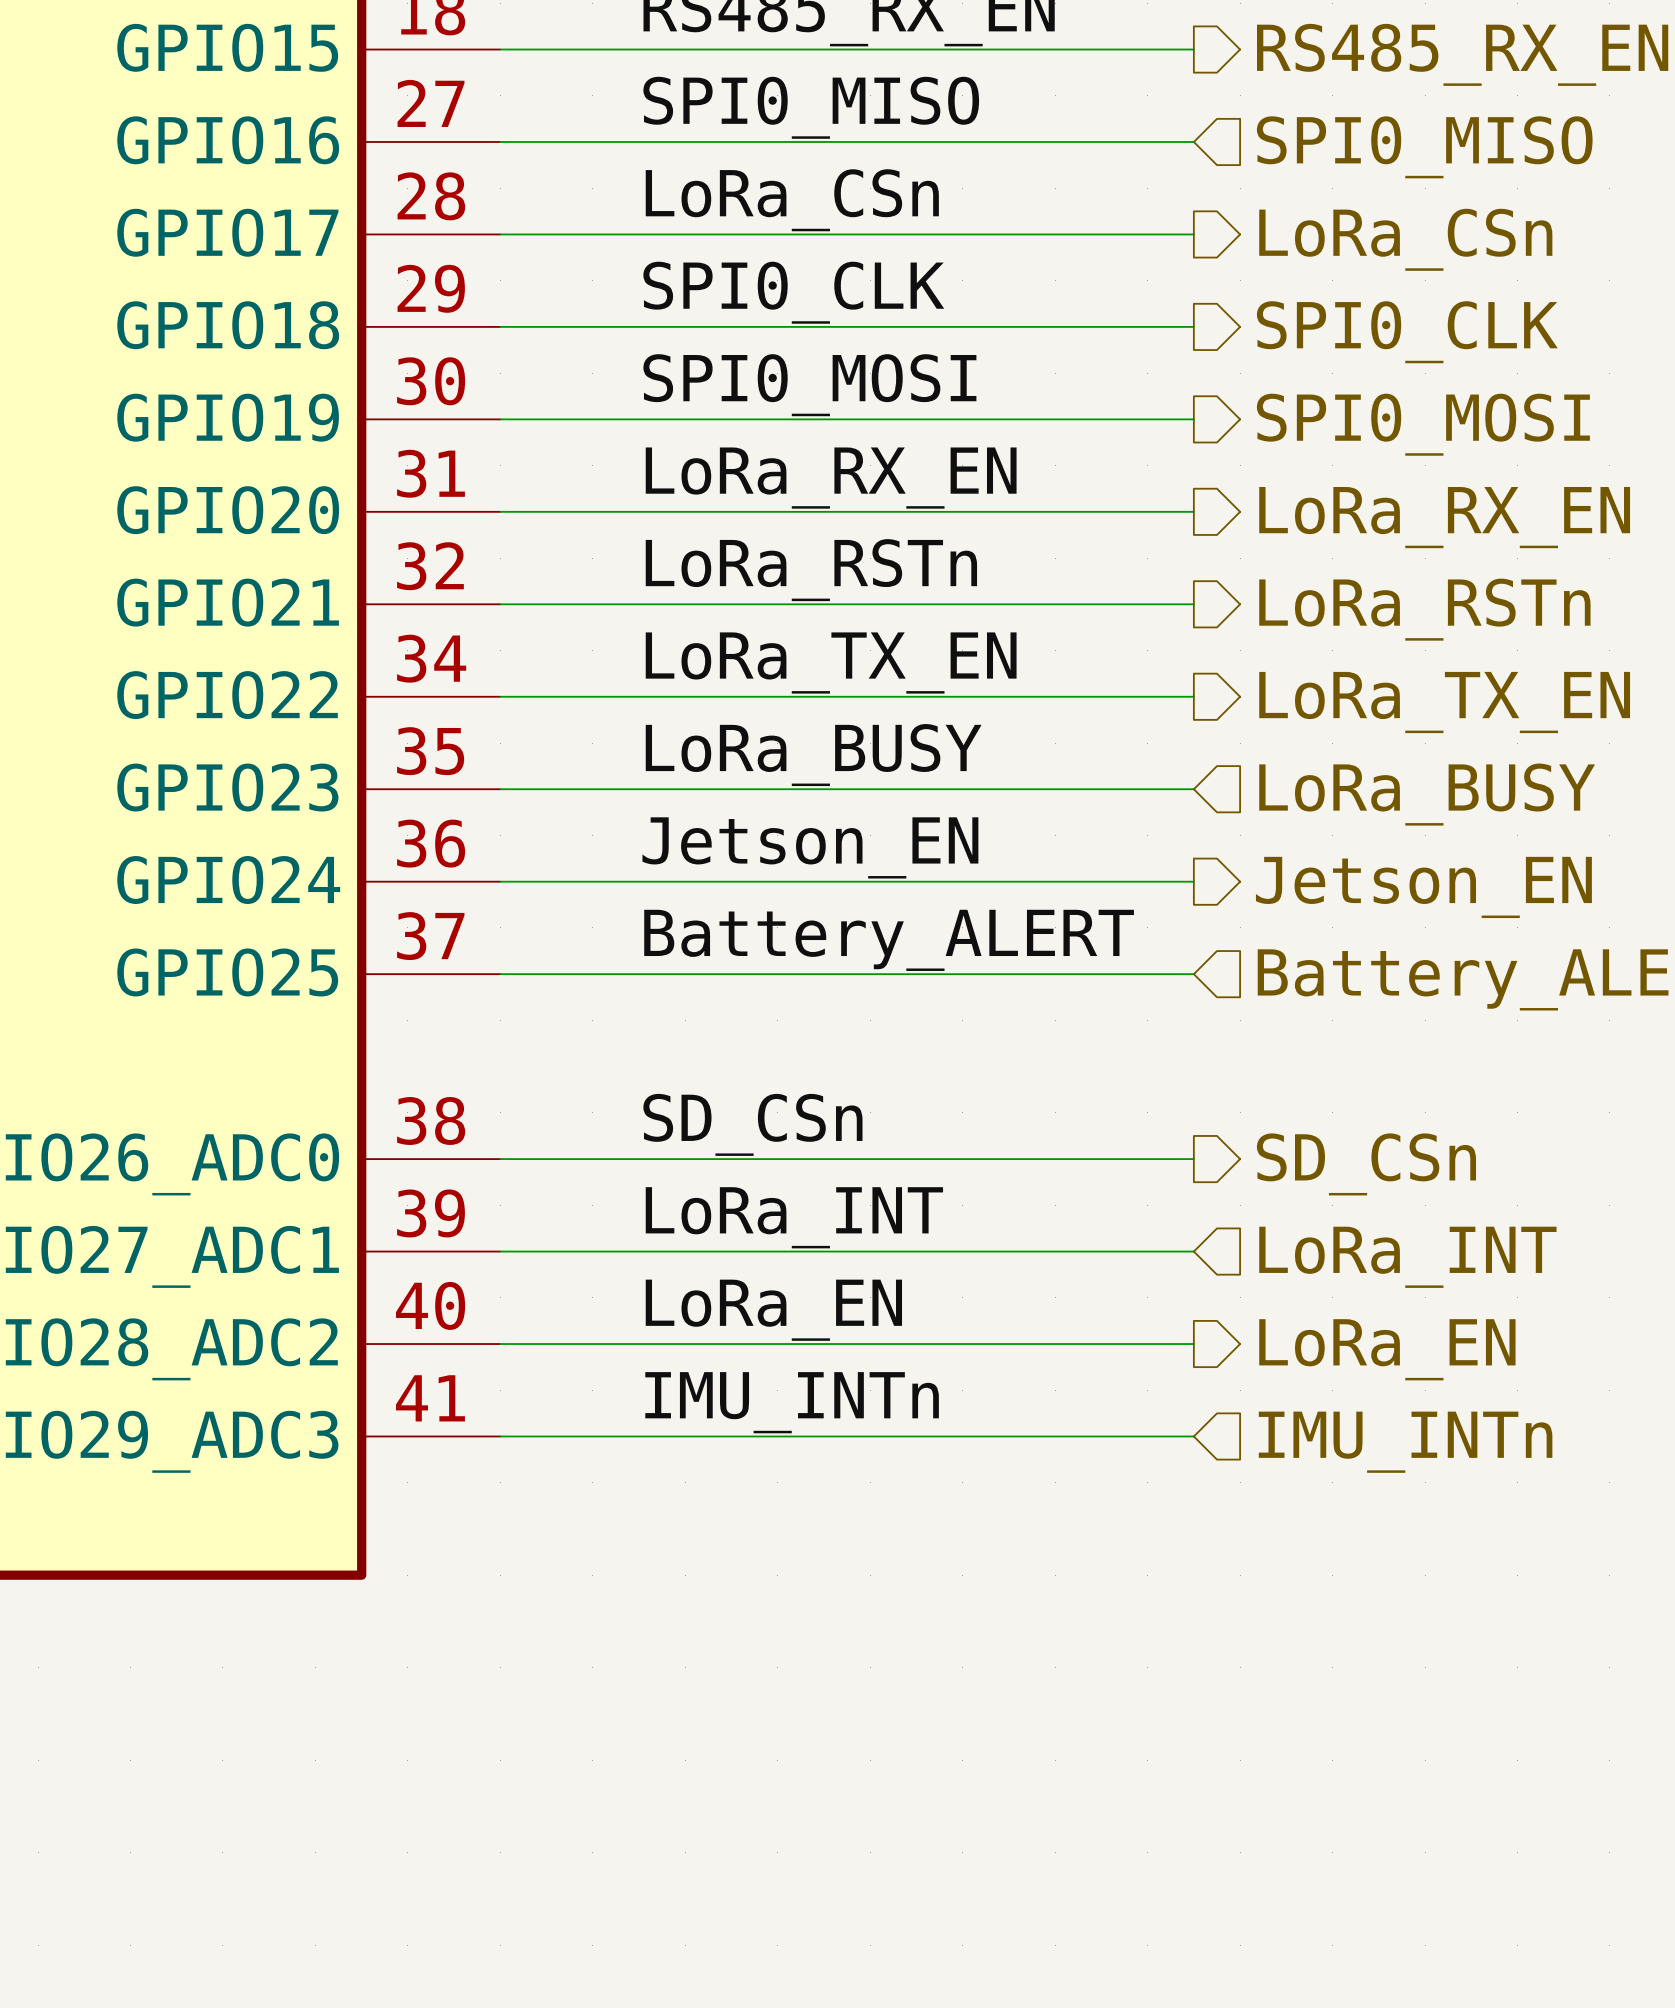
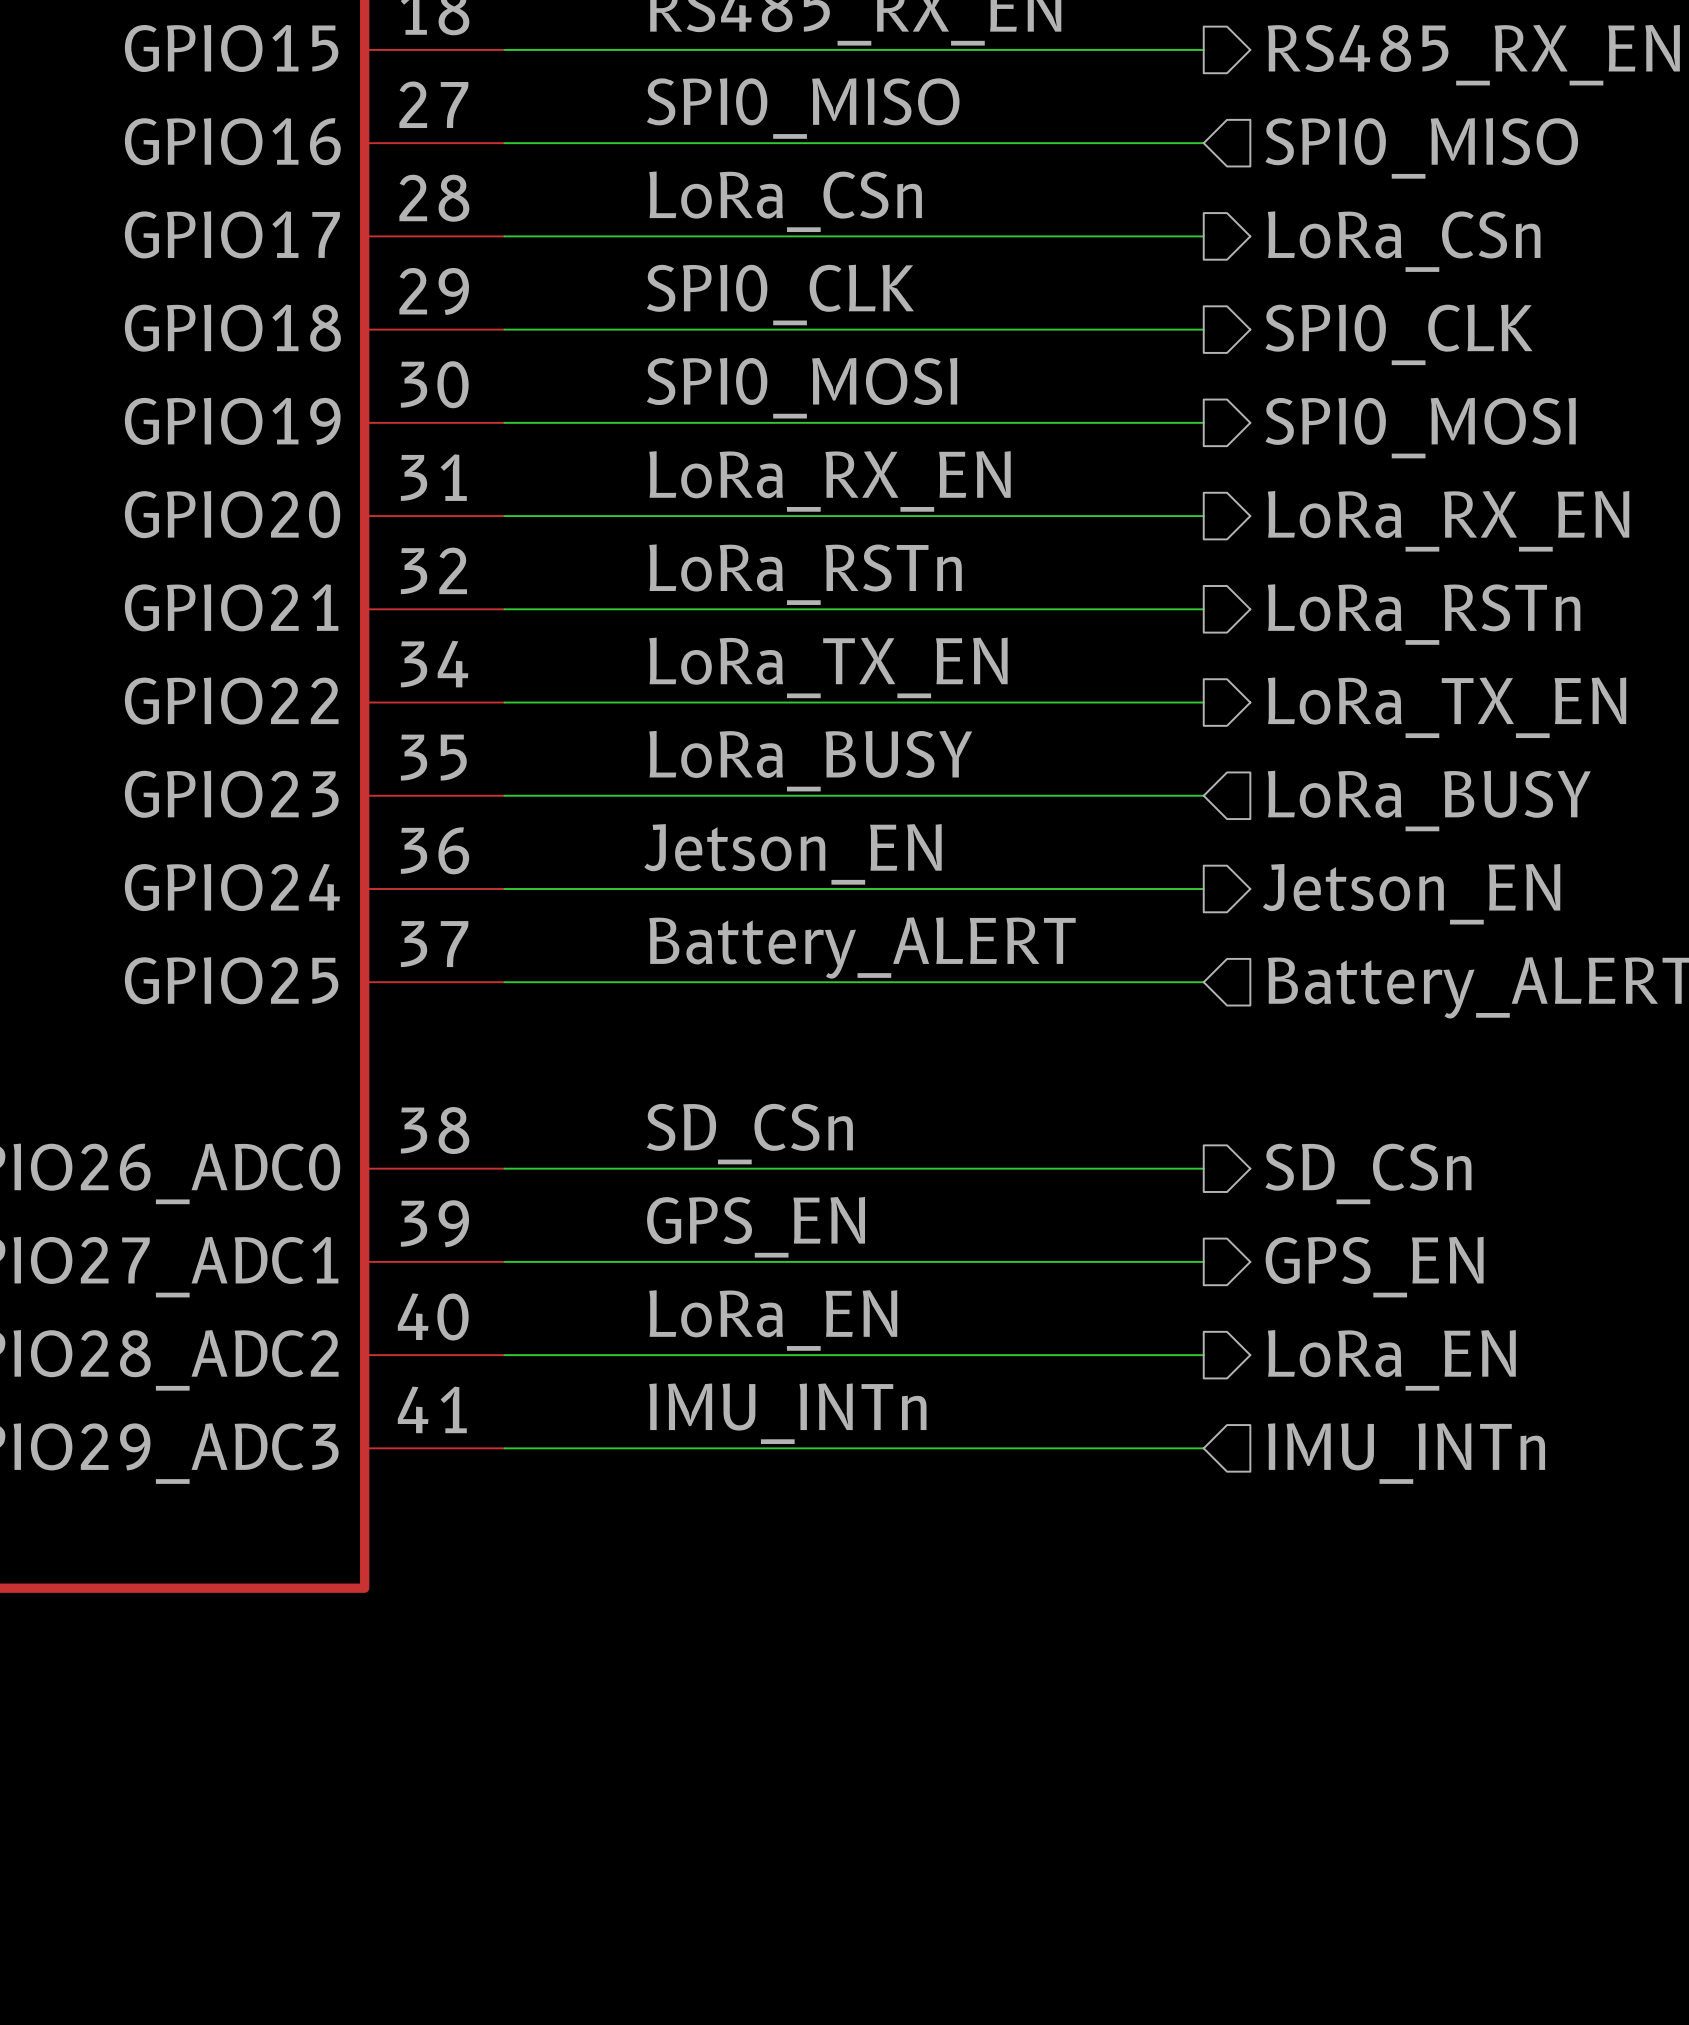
label: LoRa_INT (794, 1217) -> GPS_EN (756, 1227)
hierarchical label shape: input (1407, 1257) -> output (1374, 1267)
hierarchical label: LoRa_INT (1407, 1257) -> GPS_EN (1374, 1267)

